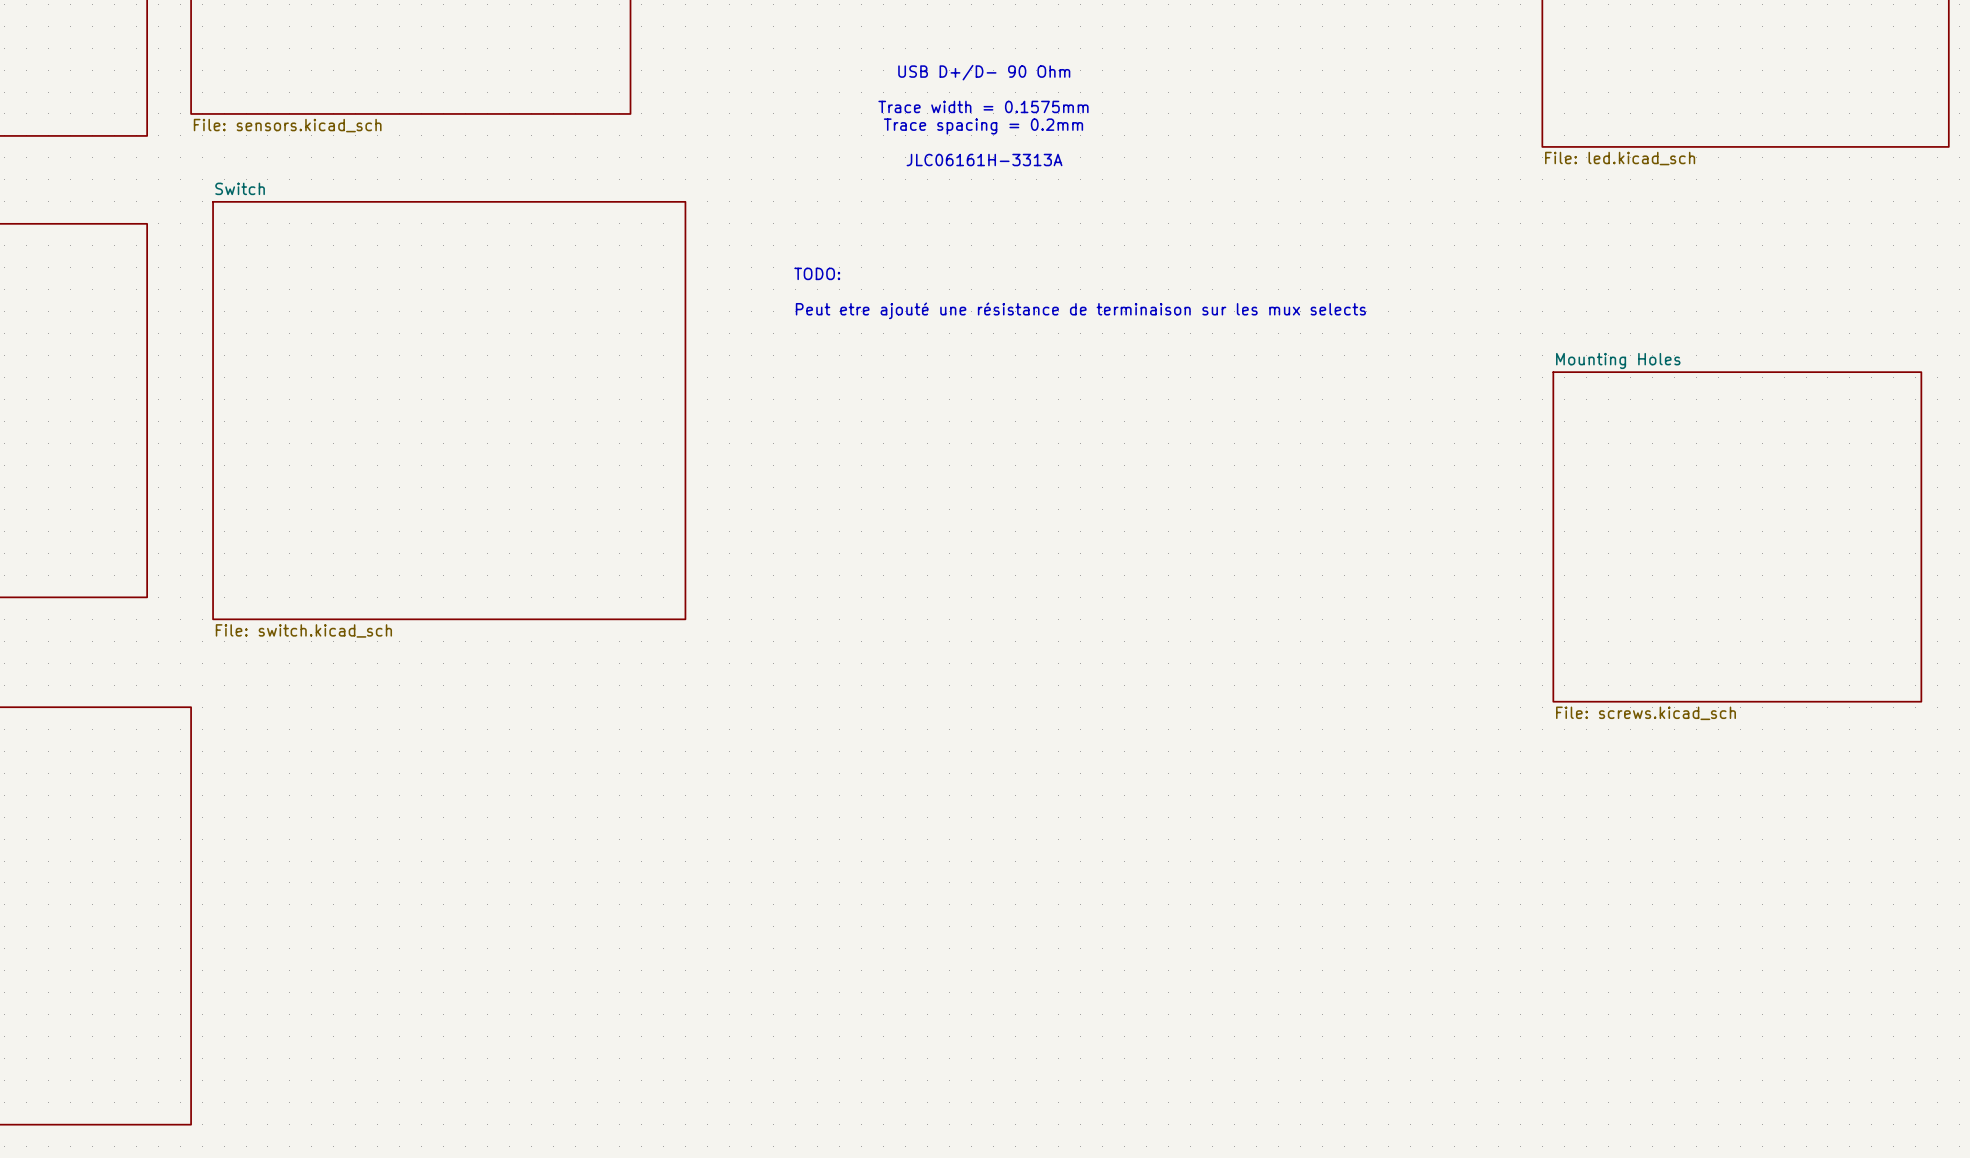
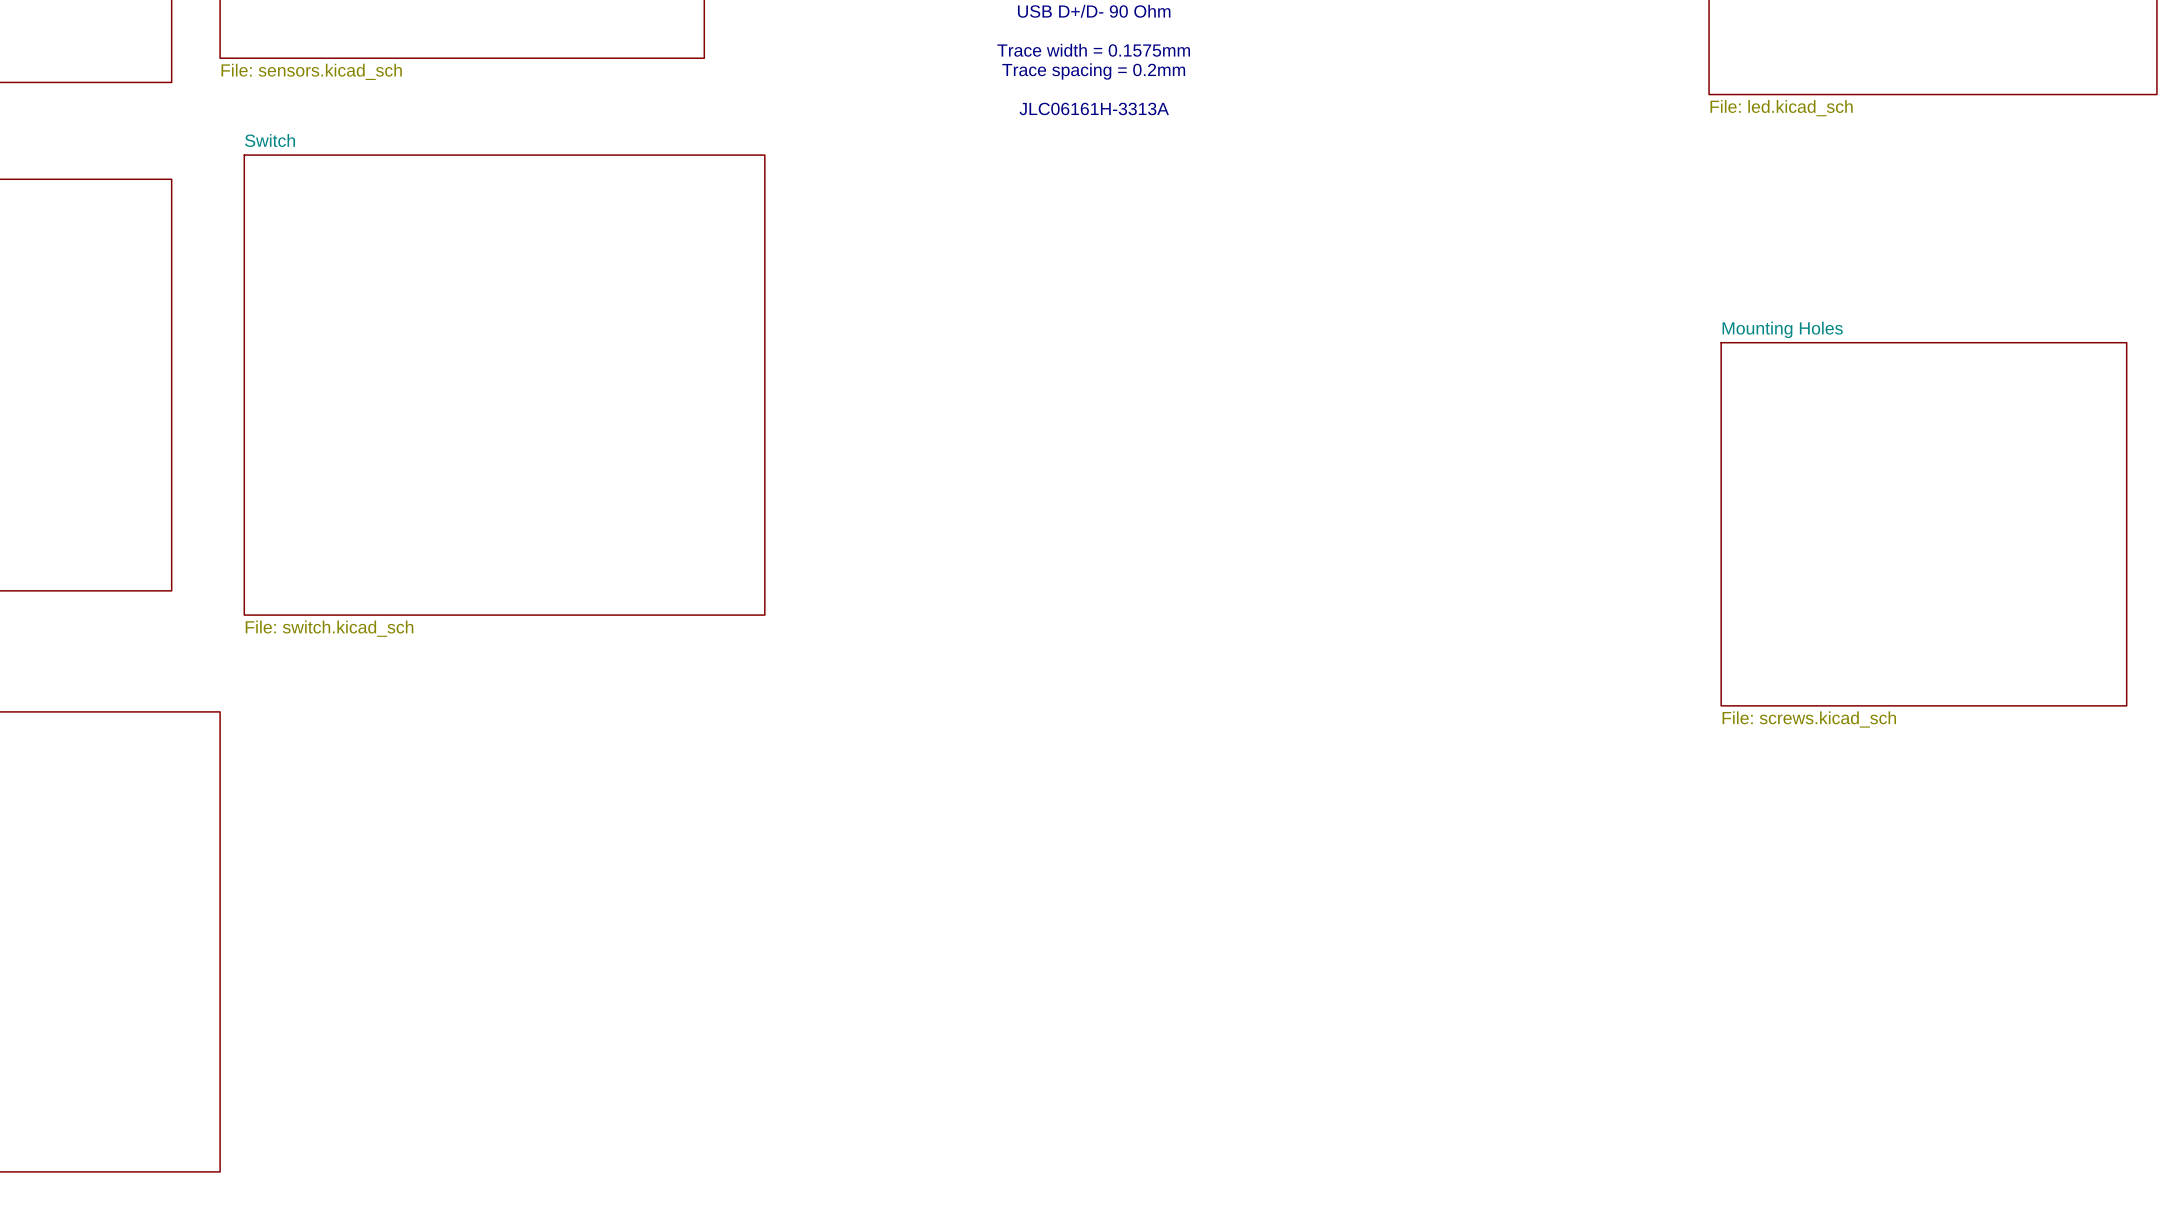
text: TODO: (817, 273) -> none
text: Peut etre ajouté une résistance de terminaison sur les mux selects (1080, 310) -> none

